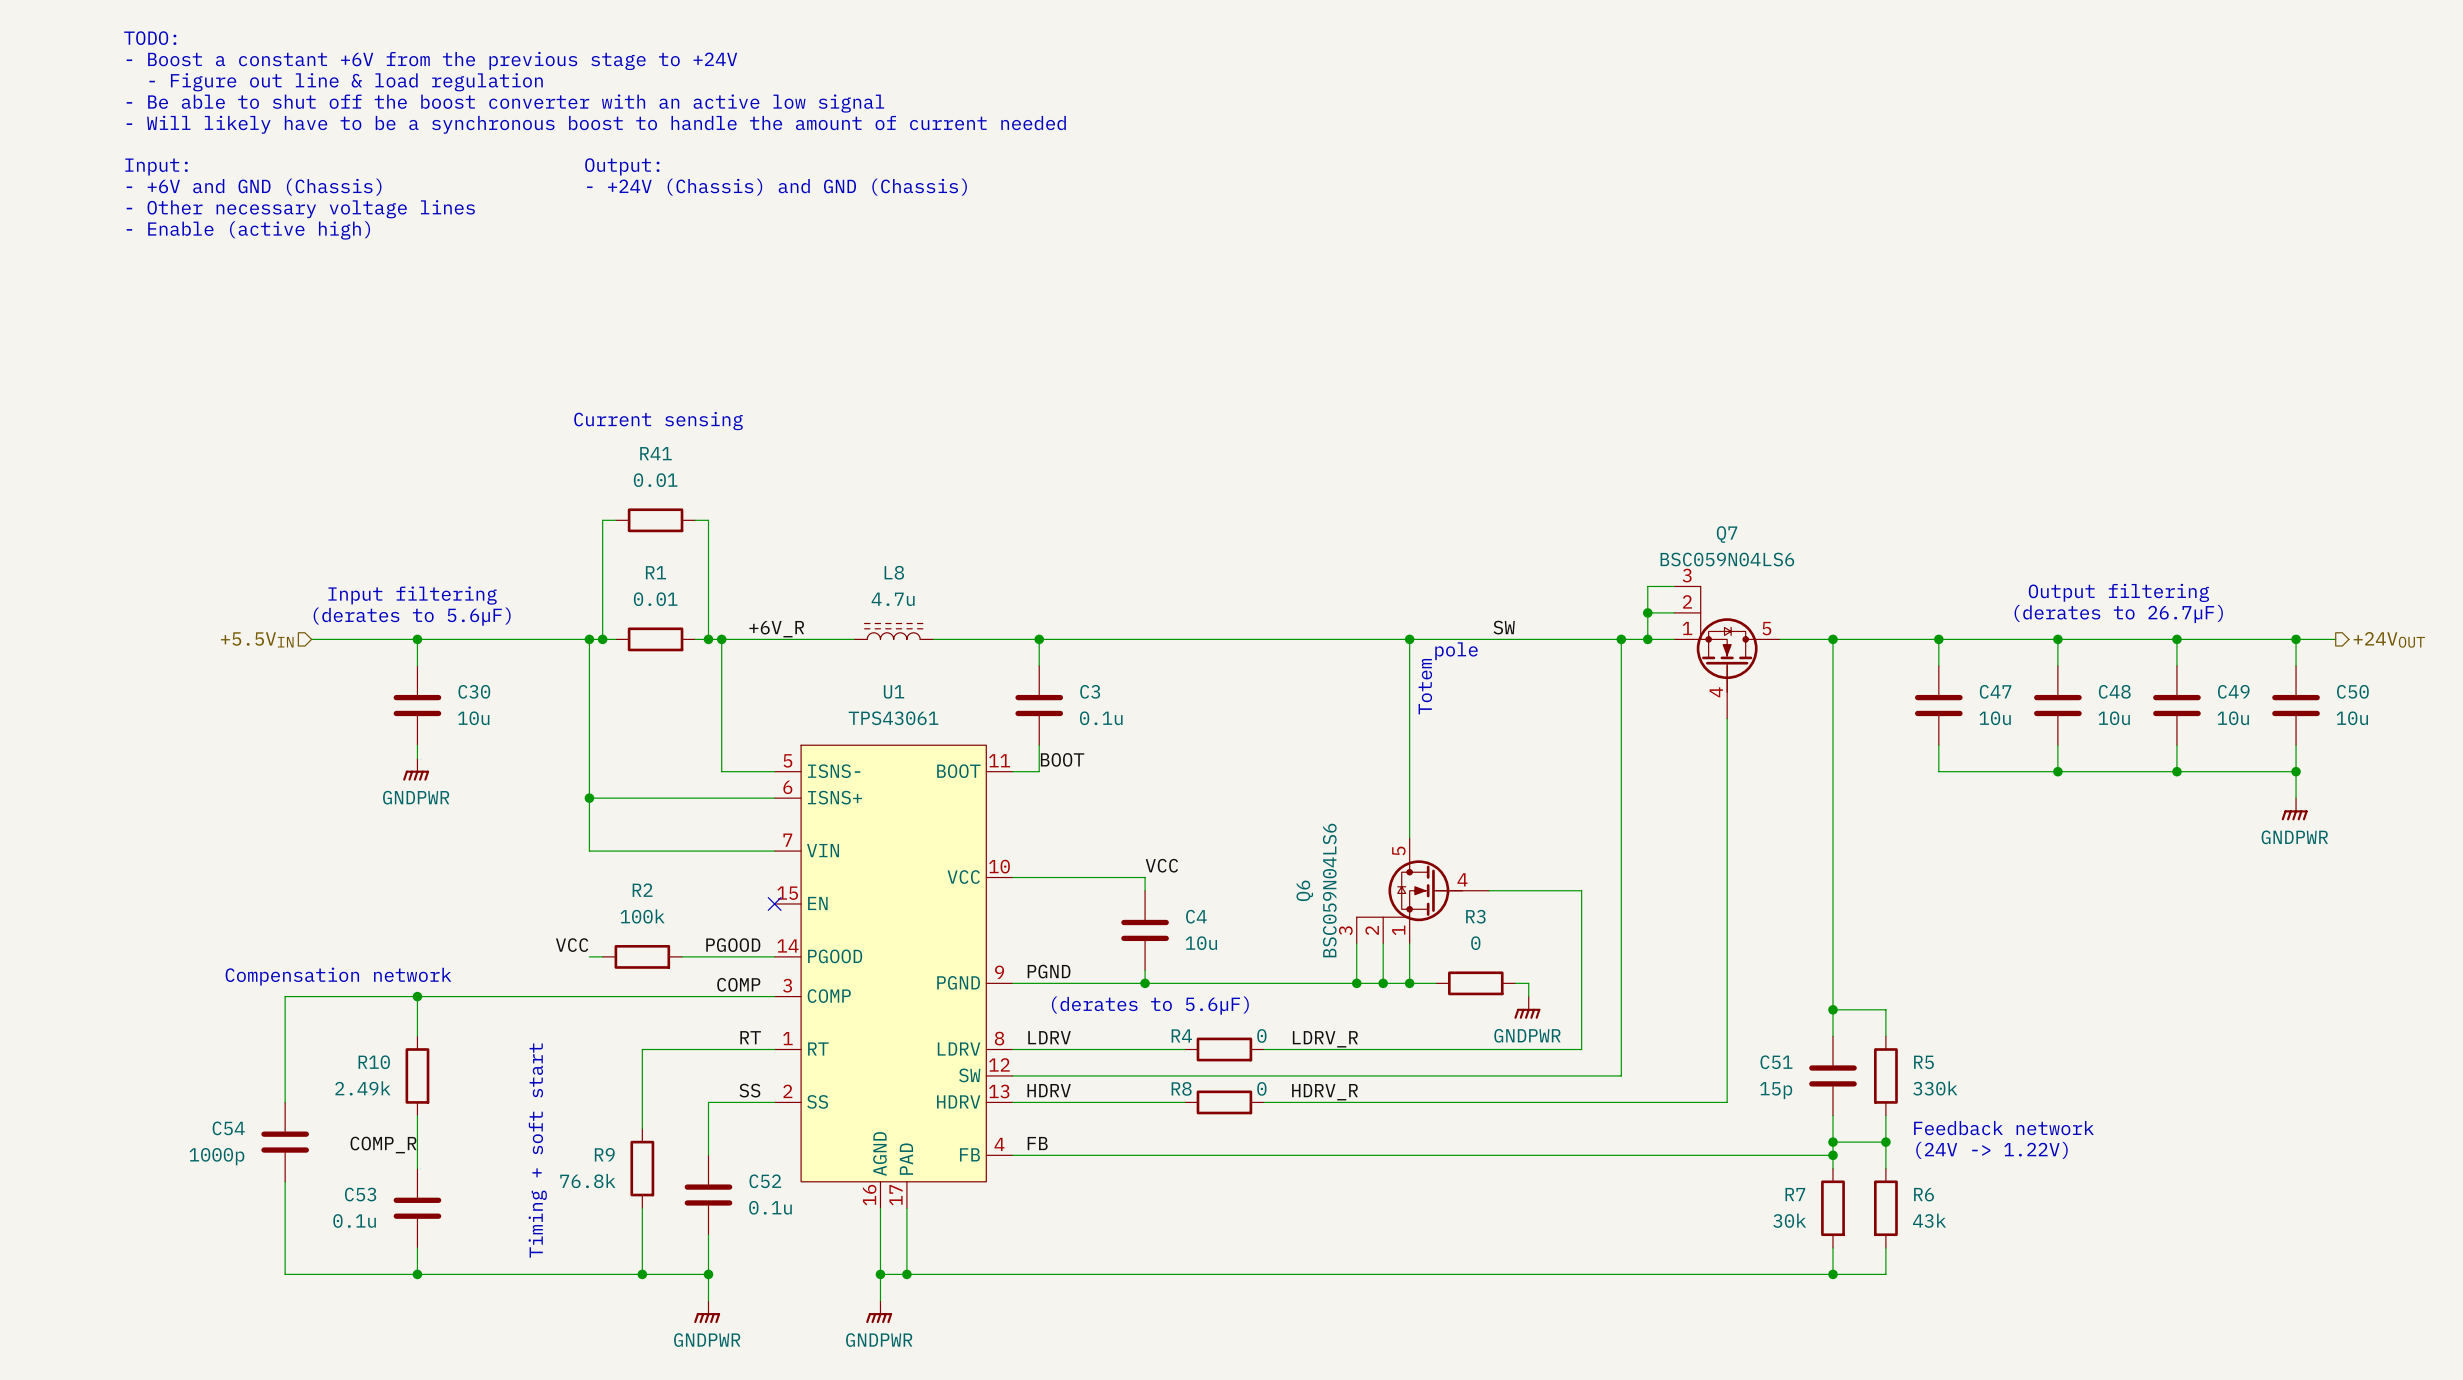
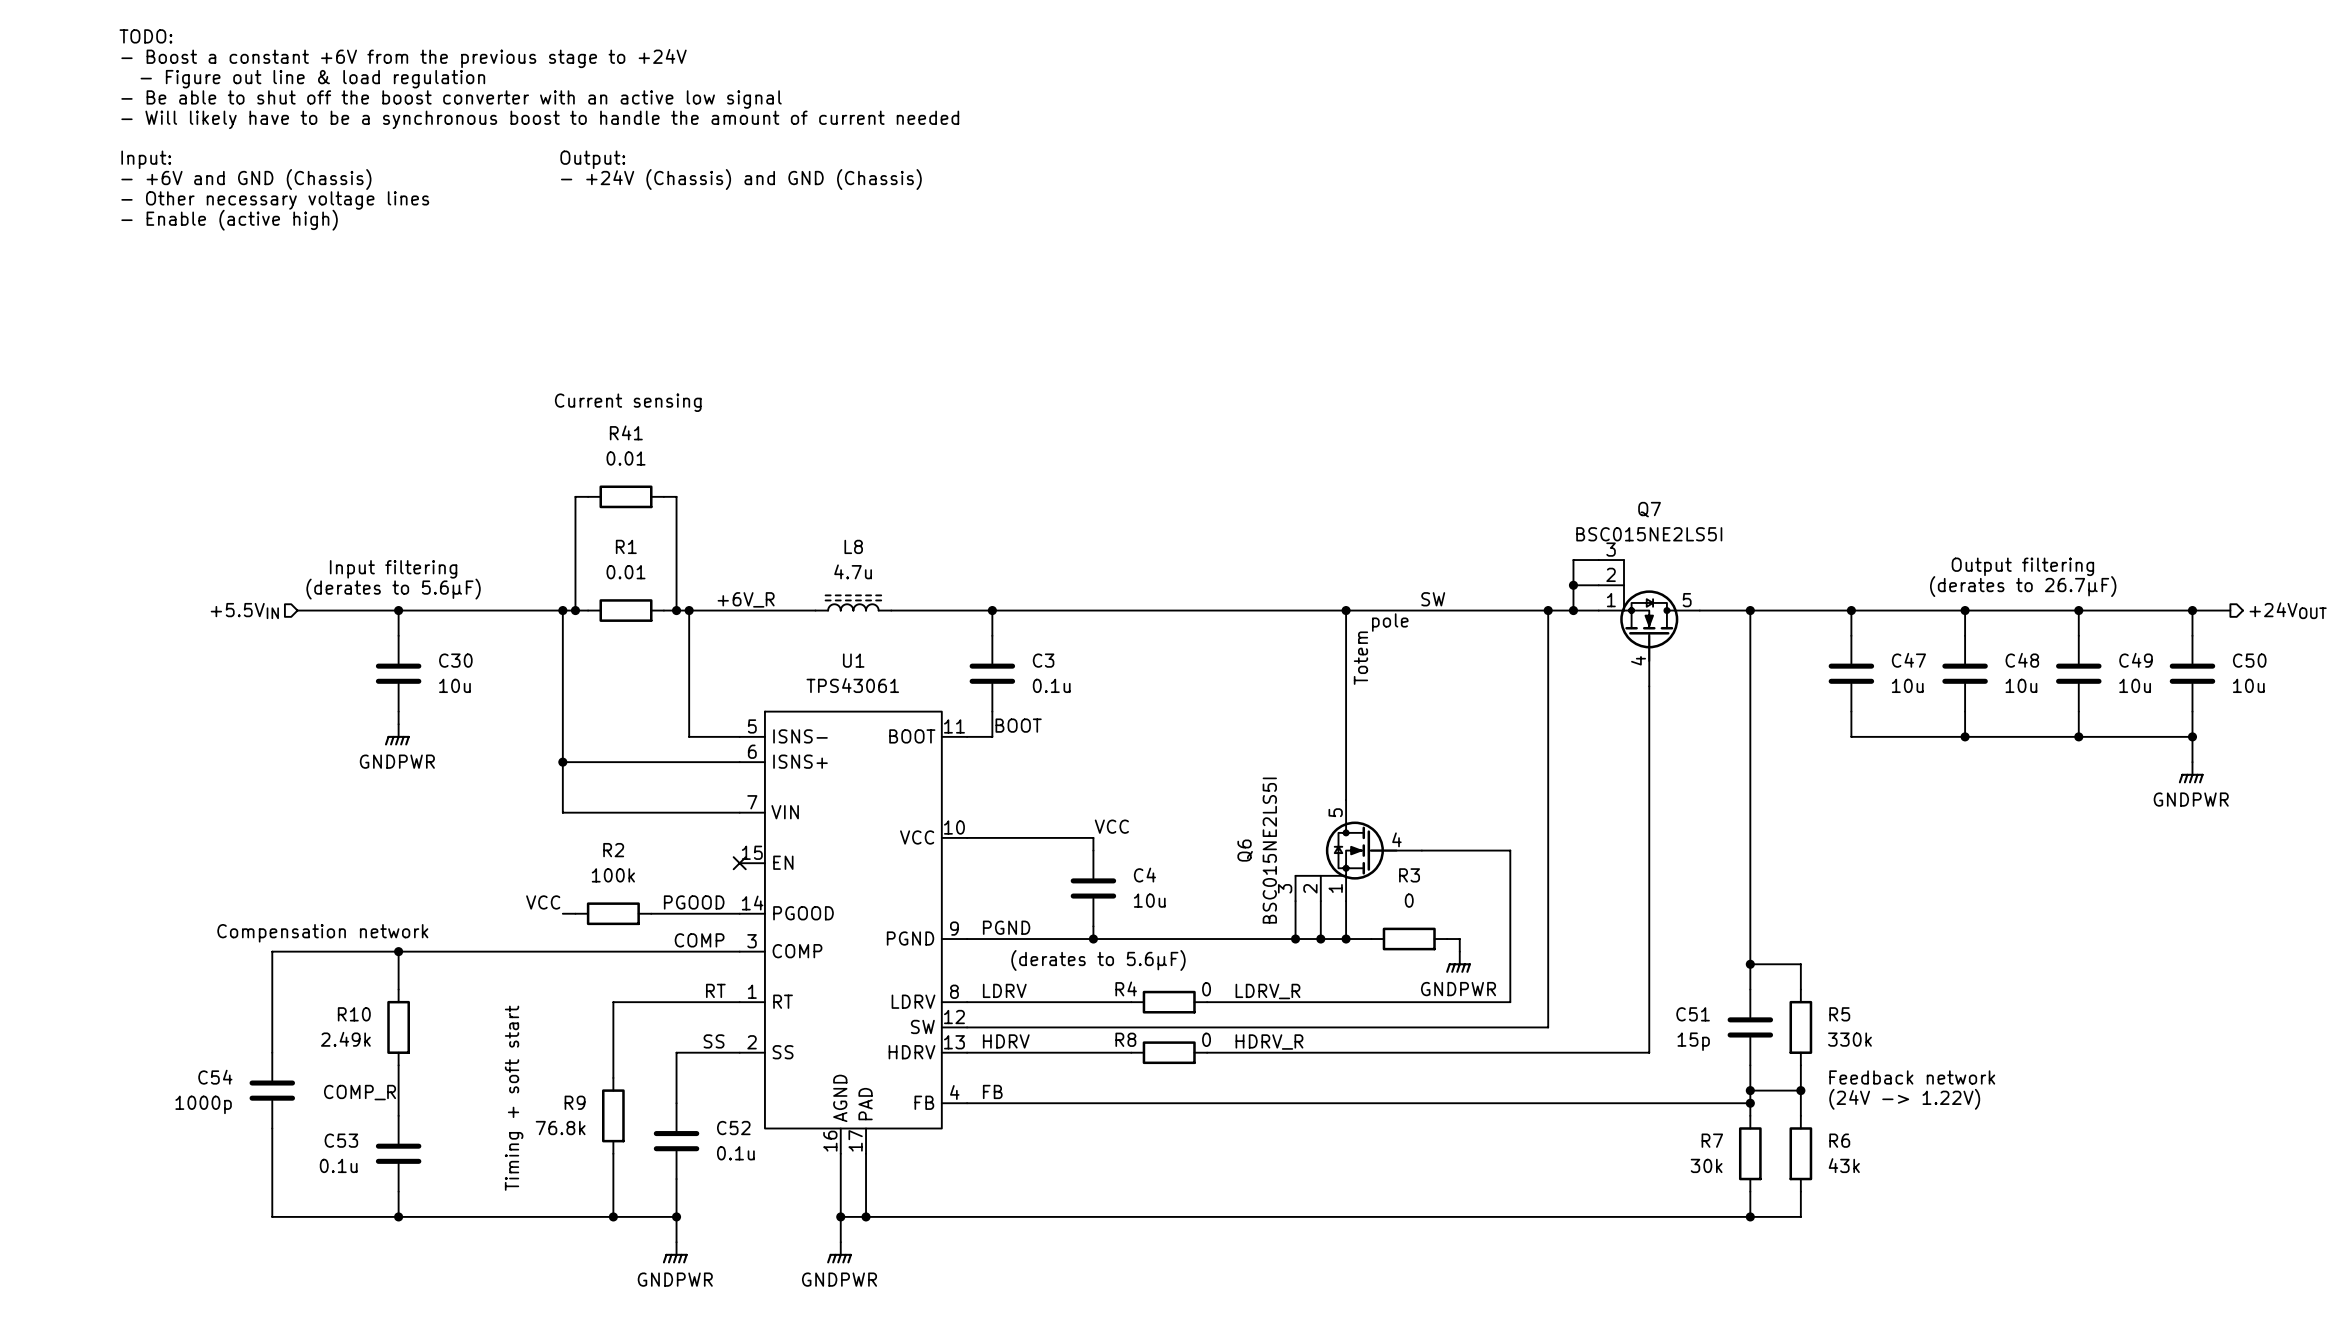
Q7 value: BSC059N04LS6 (1727, 559) -> BSC015NE2LS5I (1649, 534)
Q6 value: BSC059N04LS6 (1329, 890) -> BSC015NE2LS5I (1269, 850)

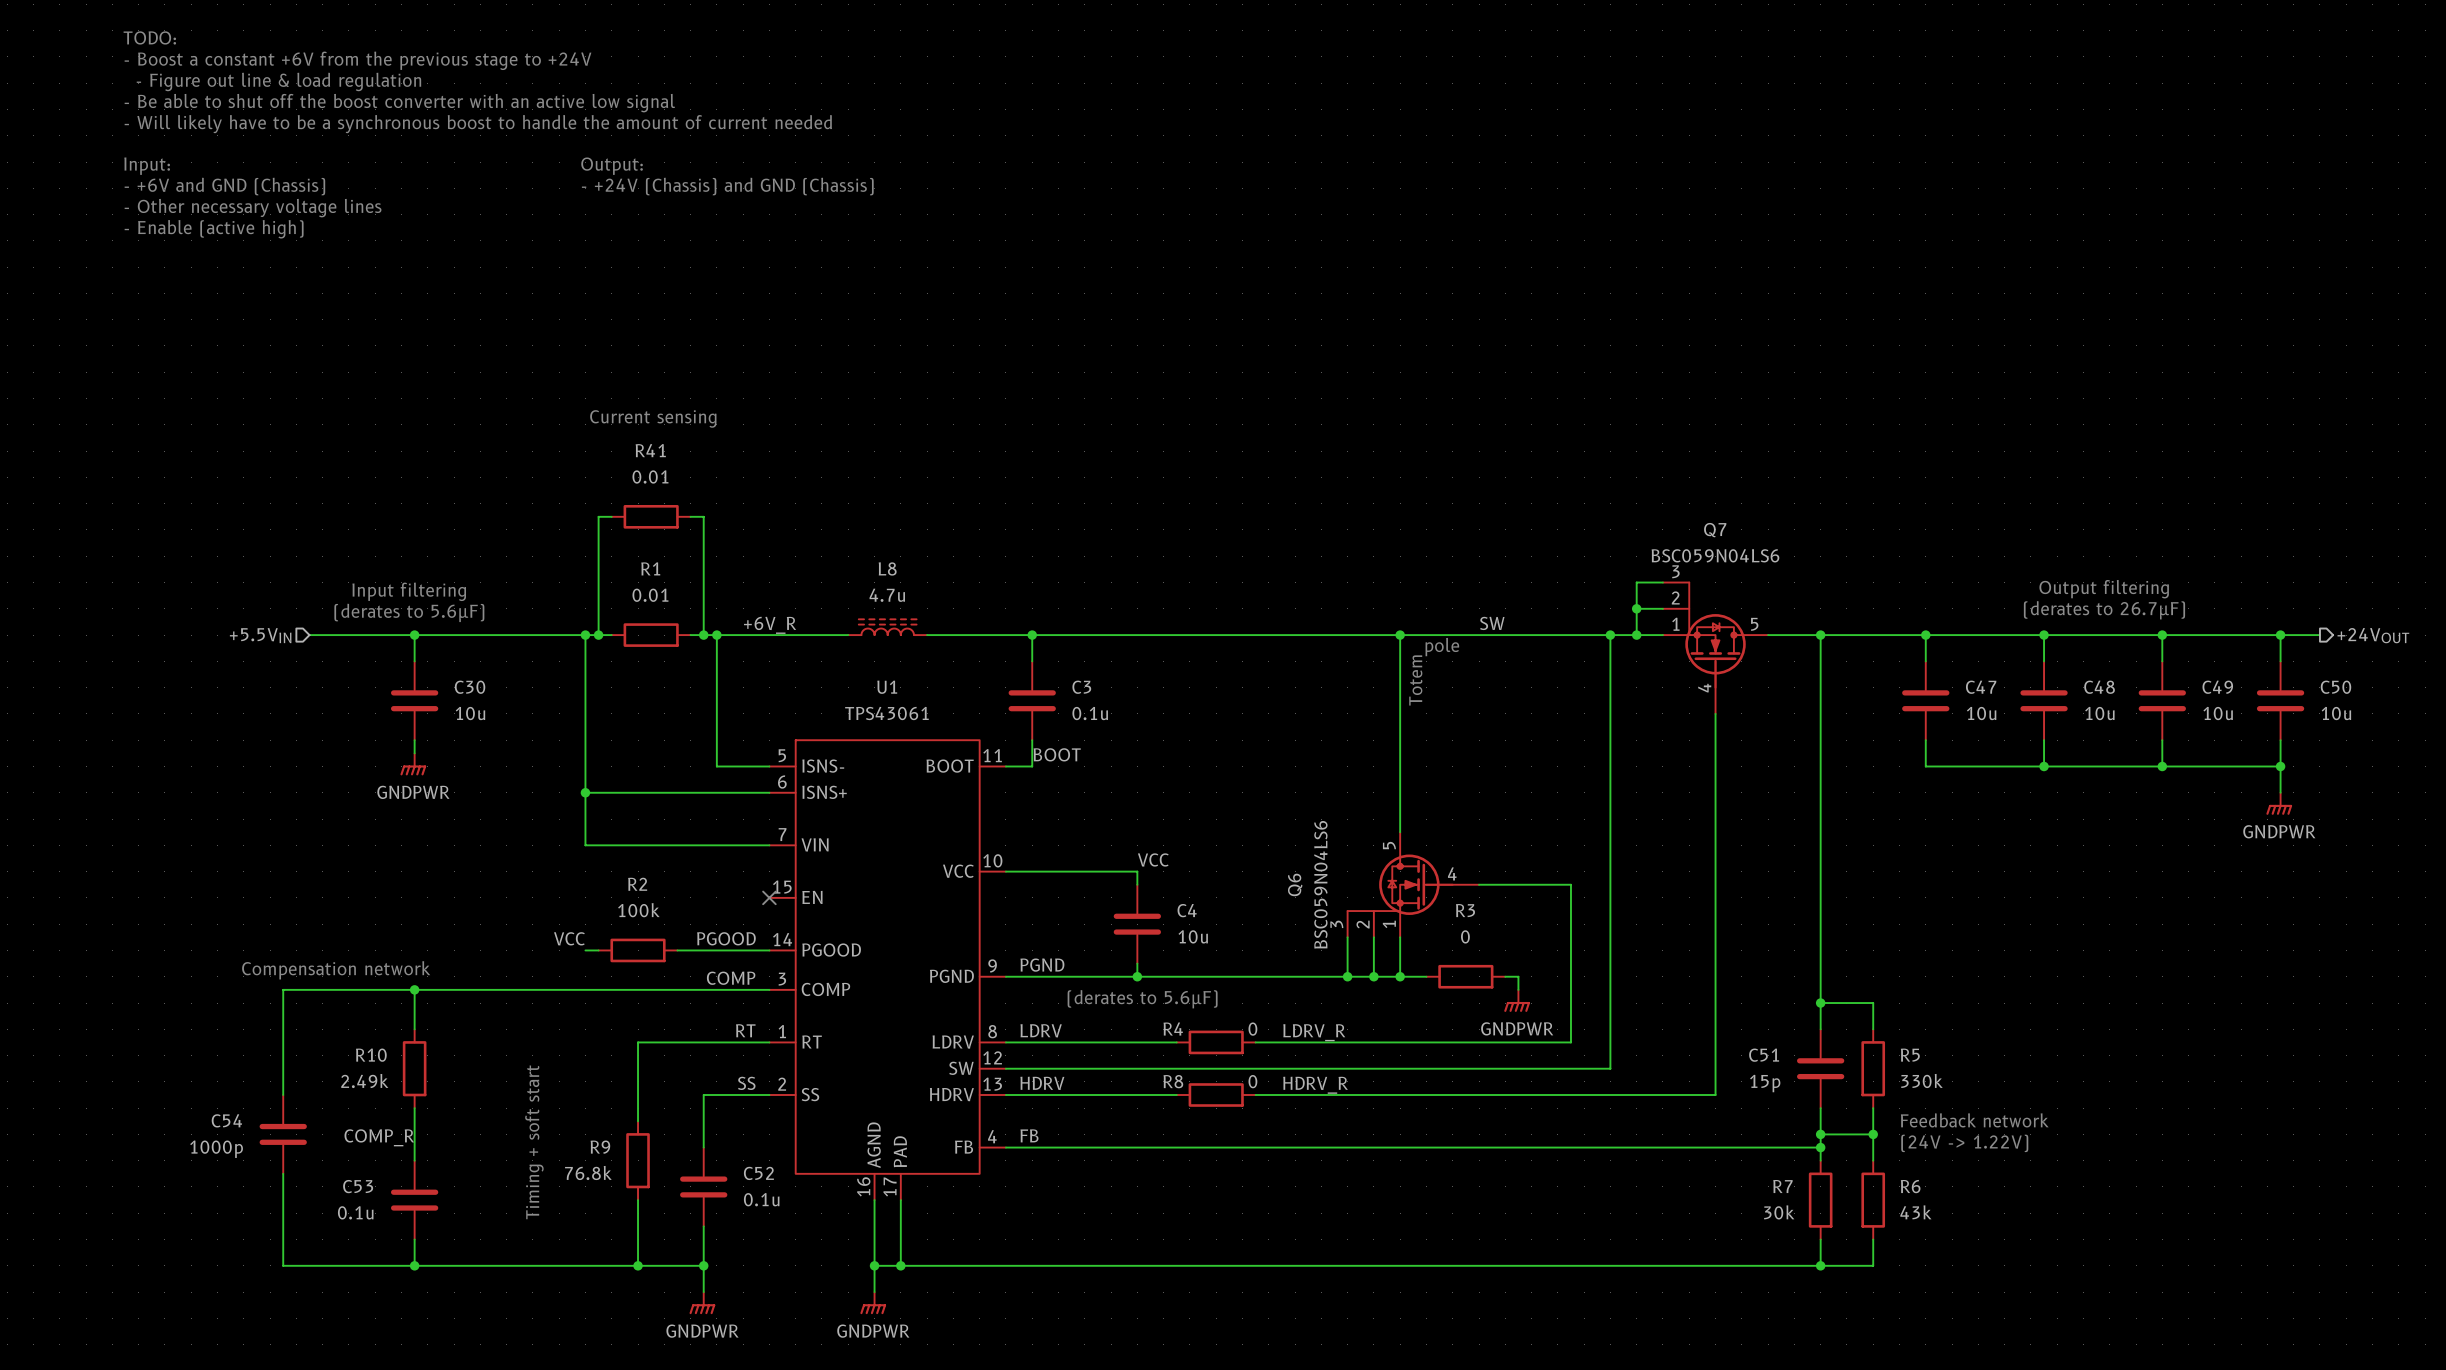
Q7 value: BSC015NE2LS5I (1649, 534) -> BSC059N04LS6 (1715, 555)
Q6 value: BSC015NE2LS5I (1269, 850) -> BSC059N04LS6 (1320, 884)

